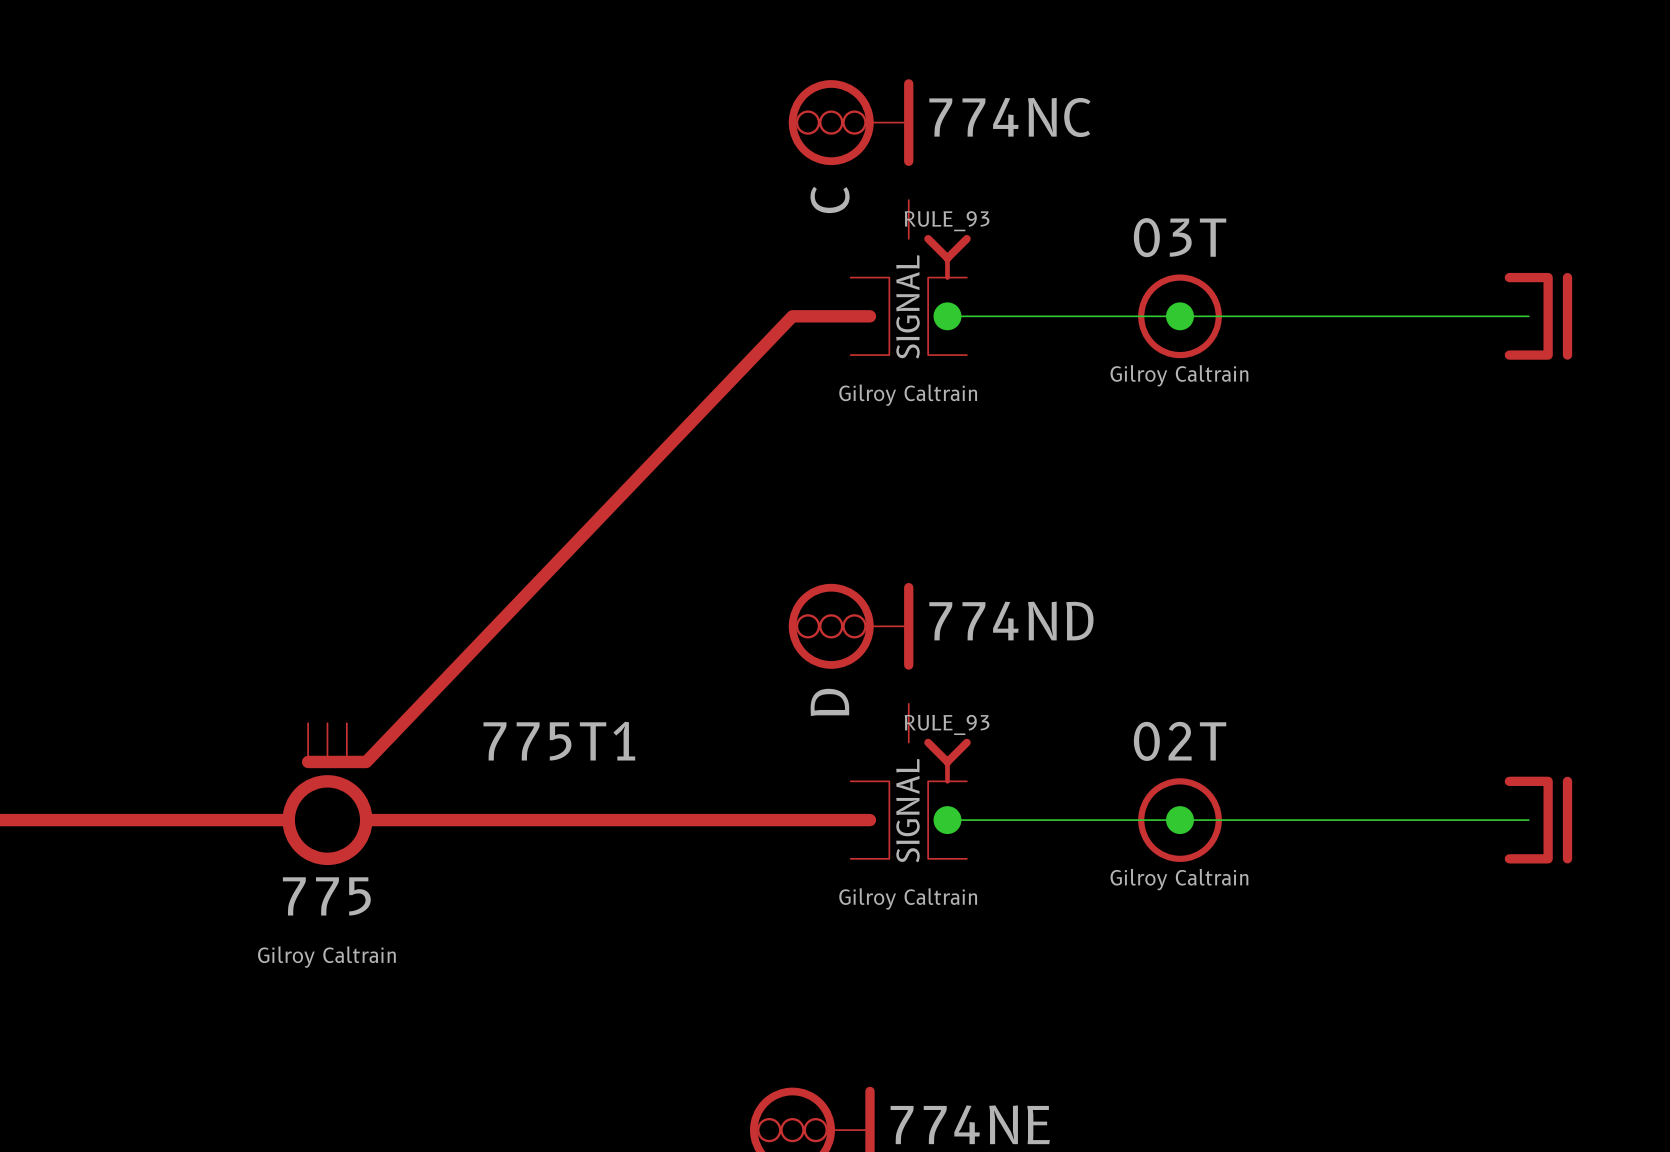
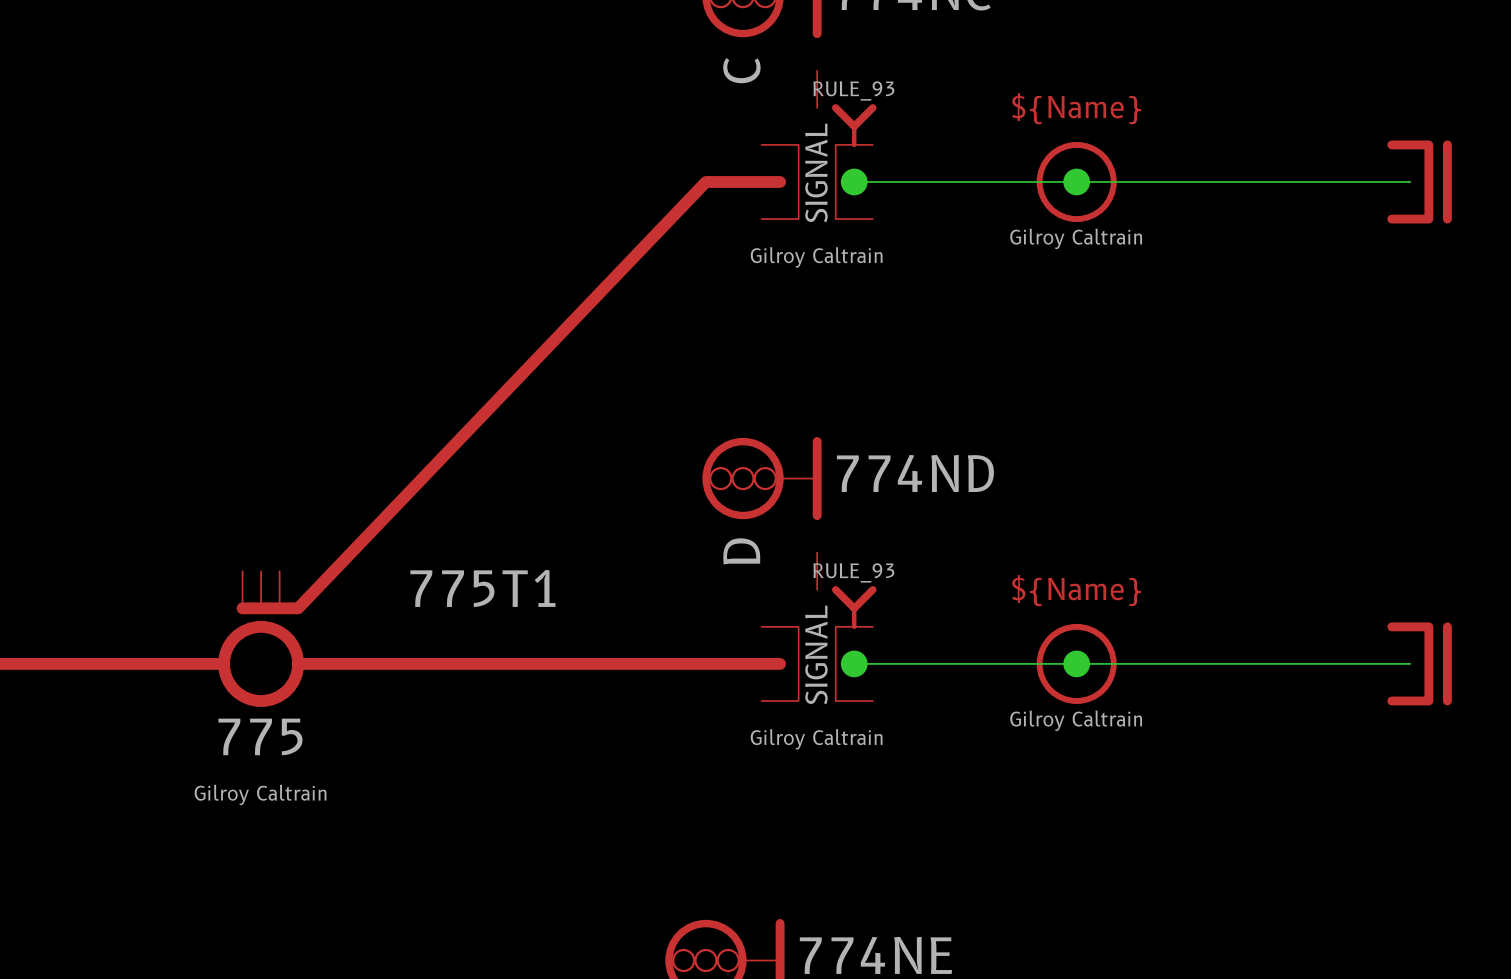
part value: 03T (1180, 237) -> none
part text: none -> ${Name} (1076, 108)
part value: 02T (1180, 741) -> none
part text: none -> ${Name} (1076, 590)

